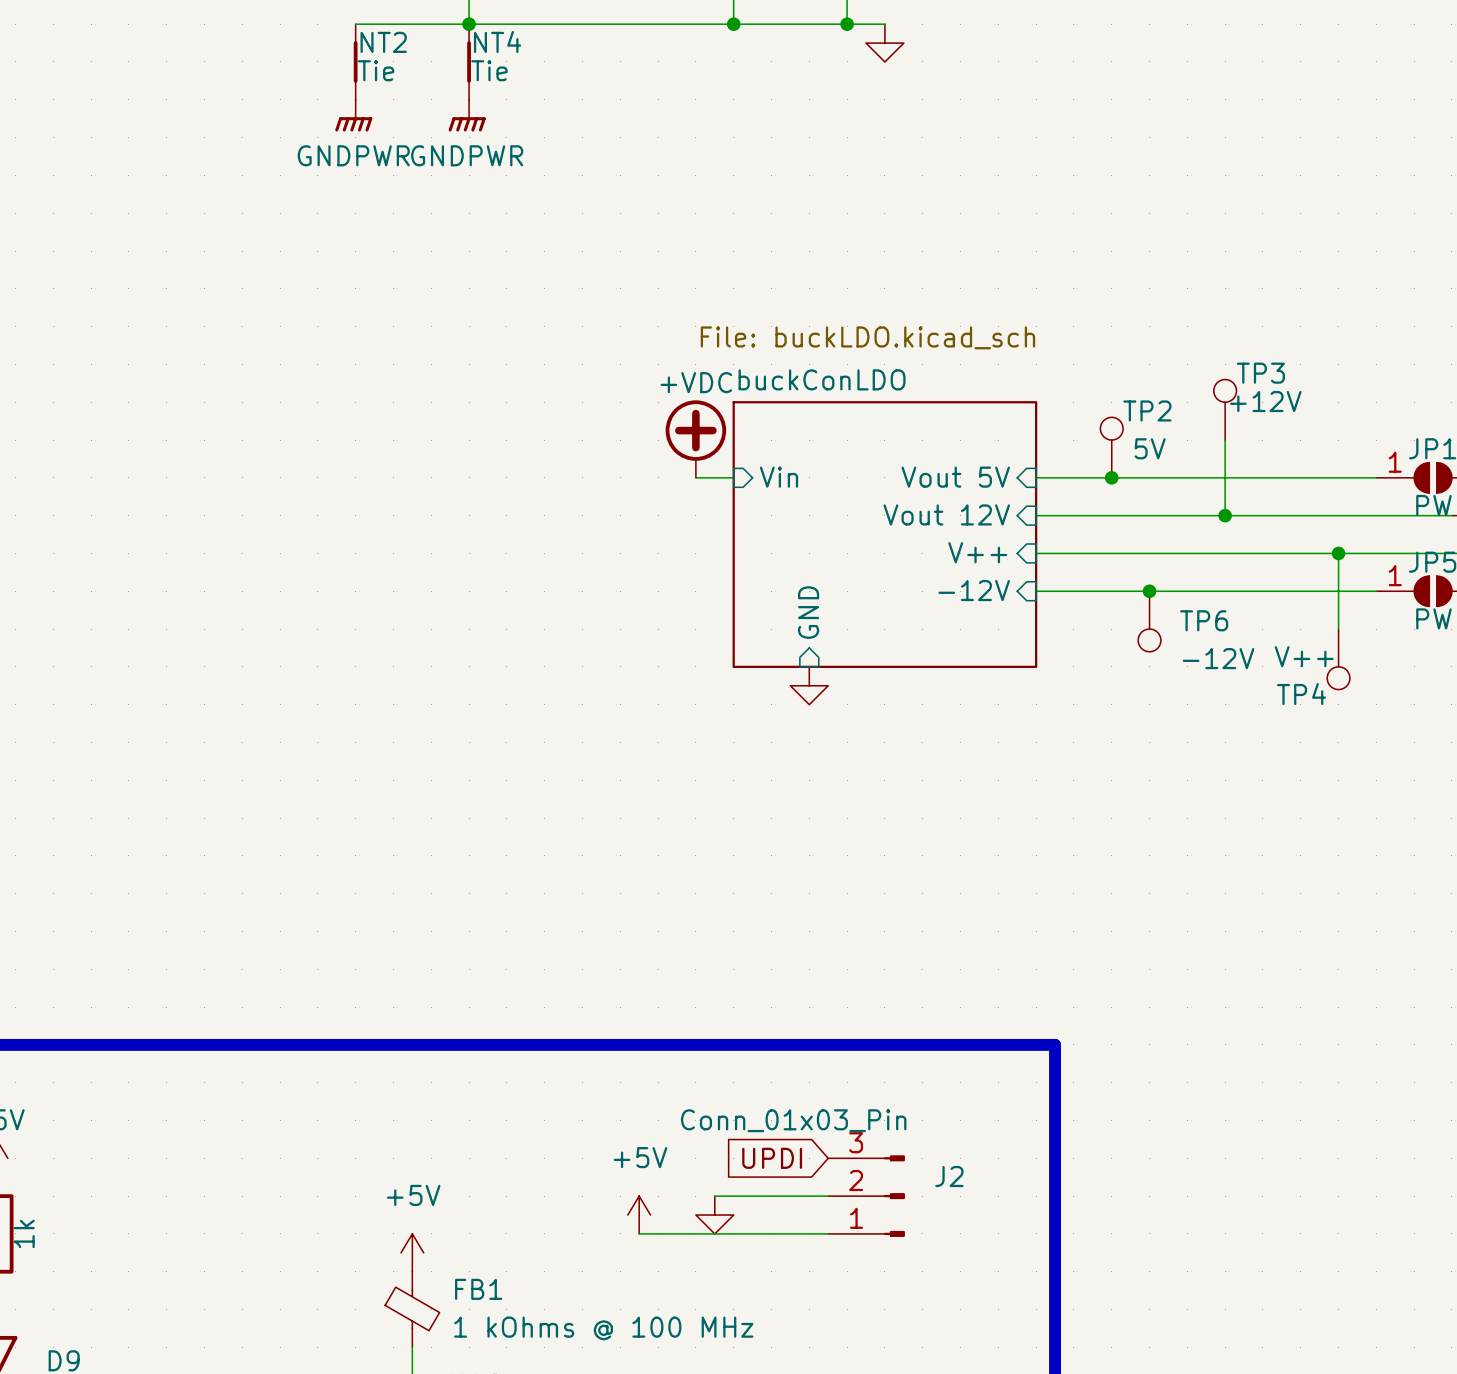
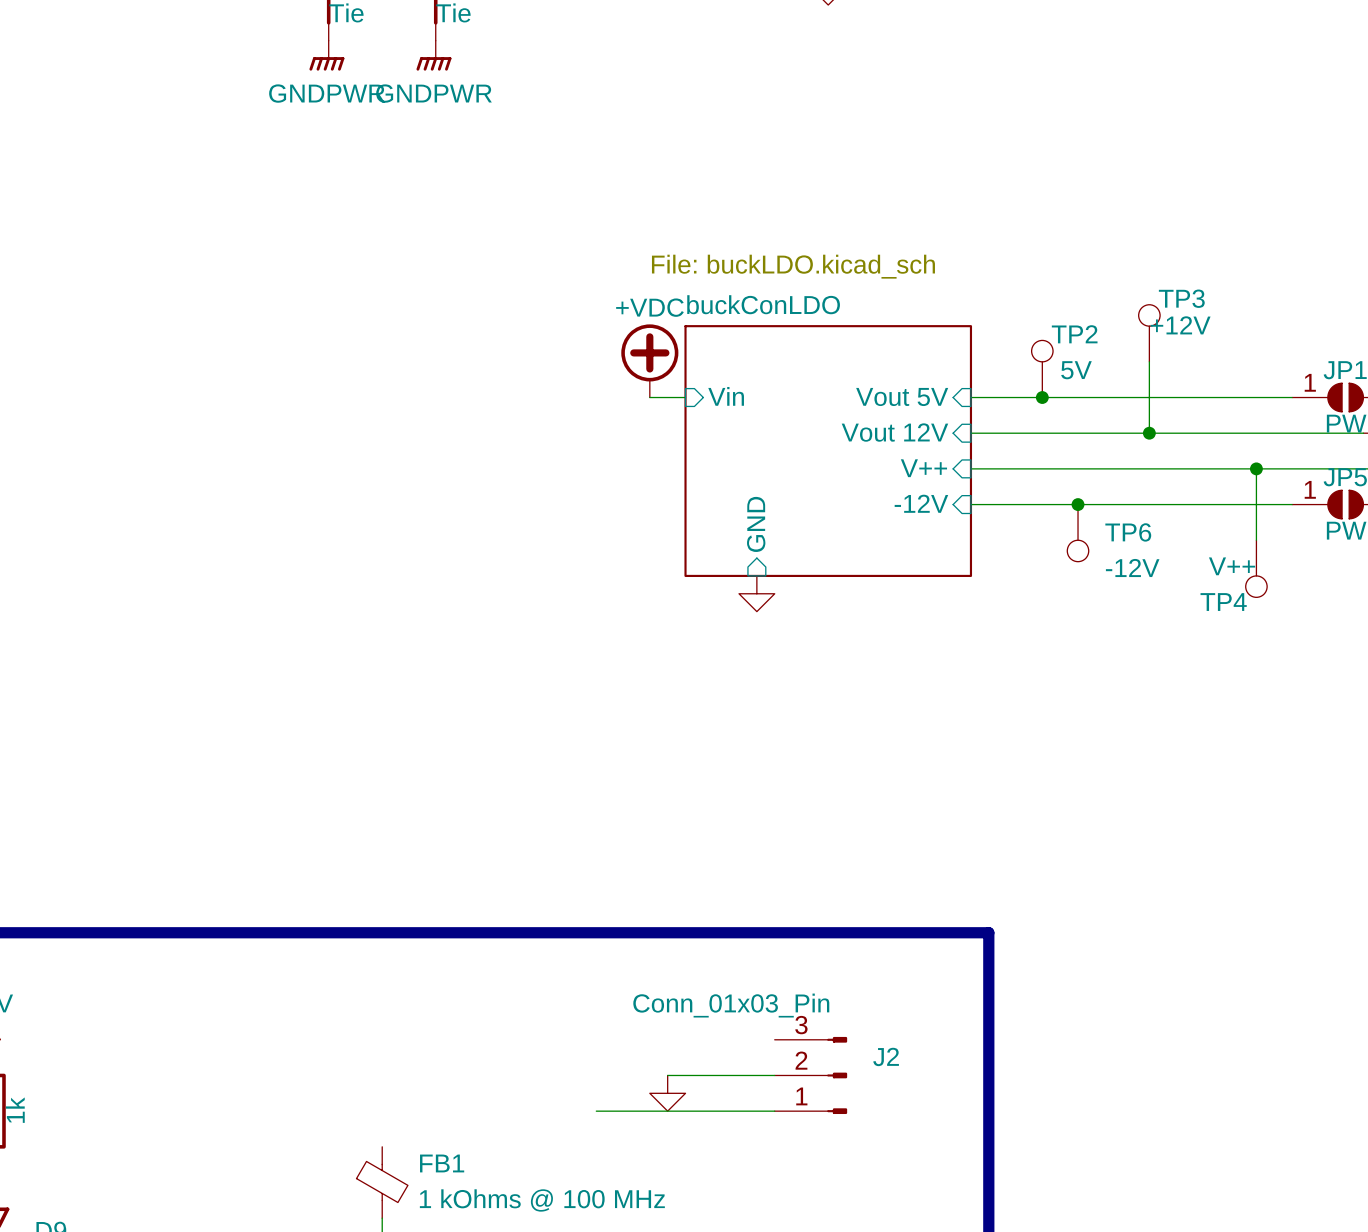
global label: UPDI (772, 1158) -> none
power symbol: +5V (639, 1215) -> none
power symbol: +5V (412, 1252) -> none

